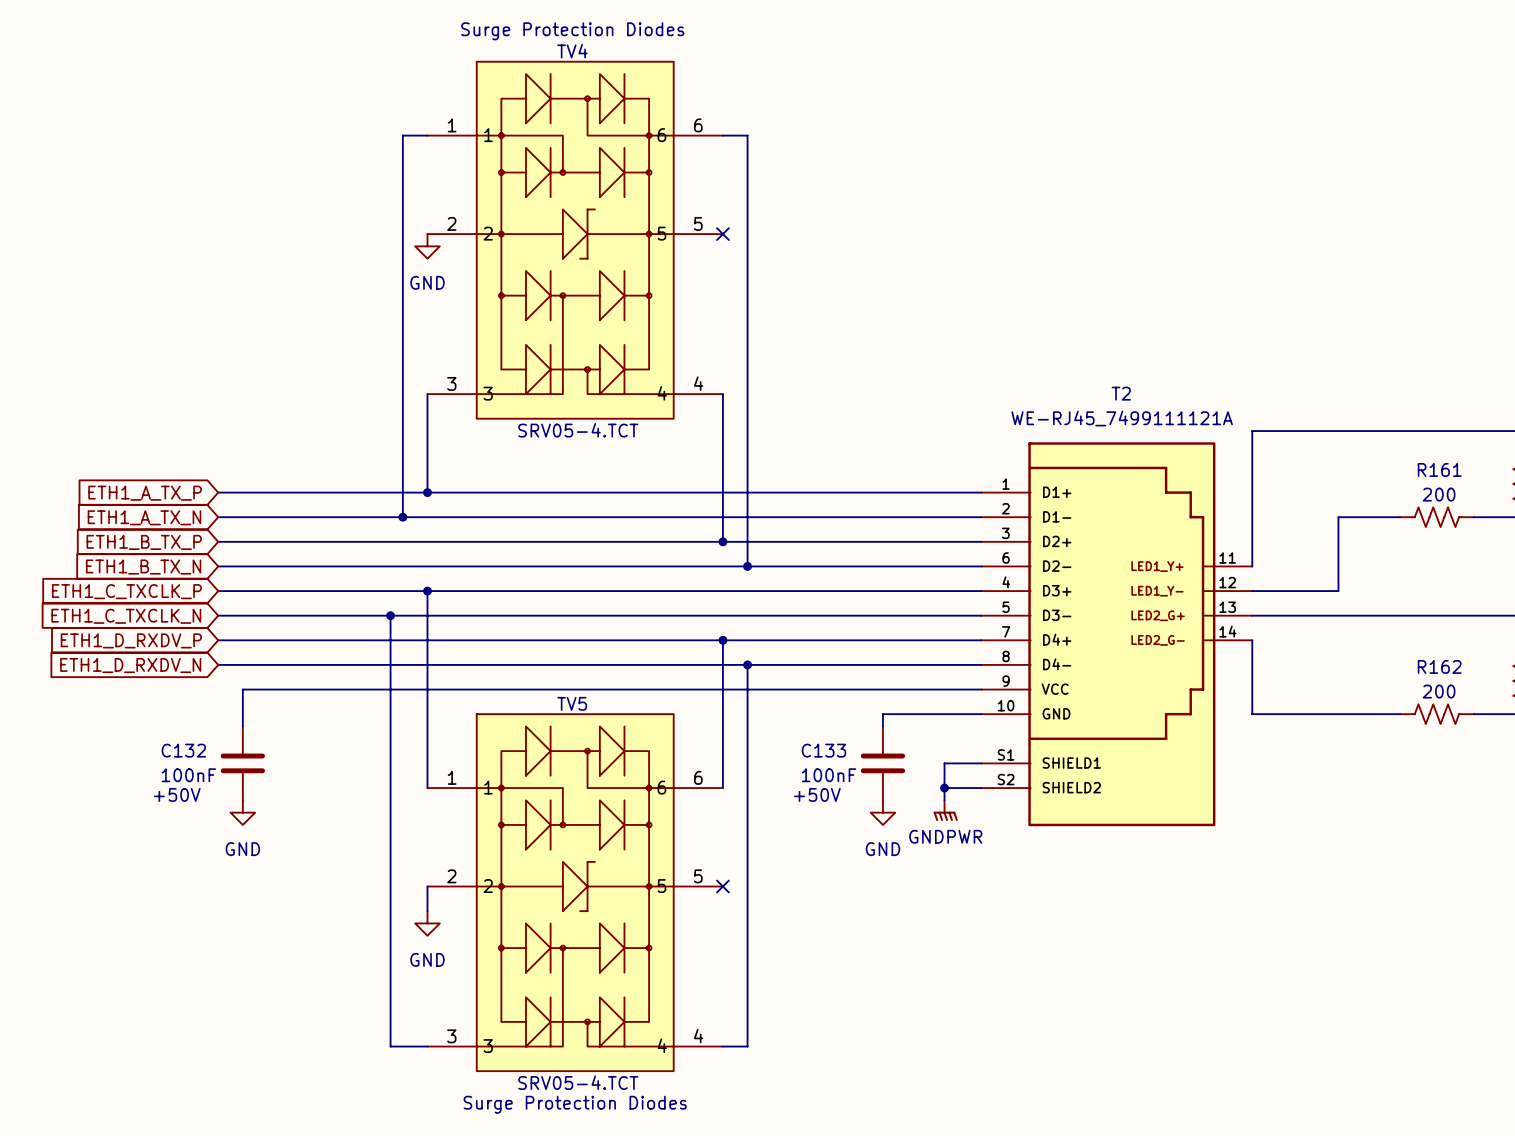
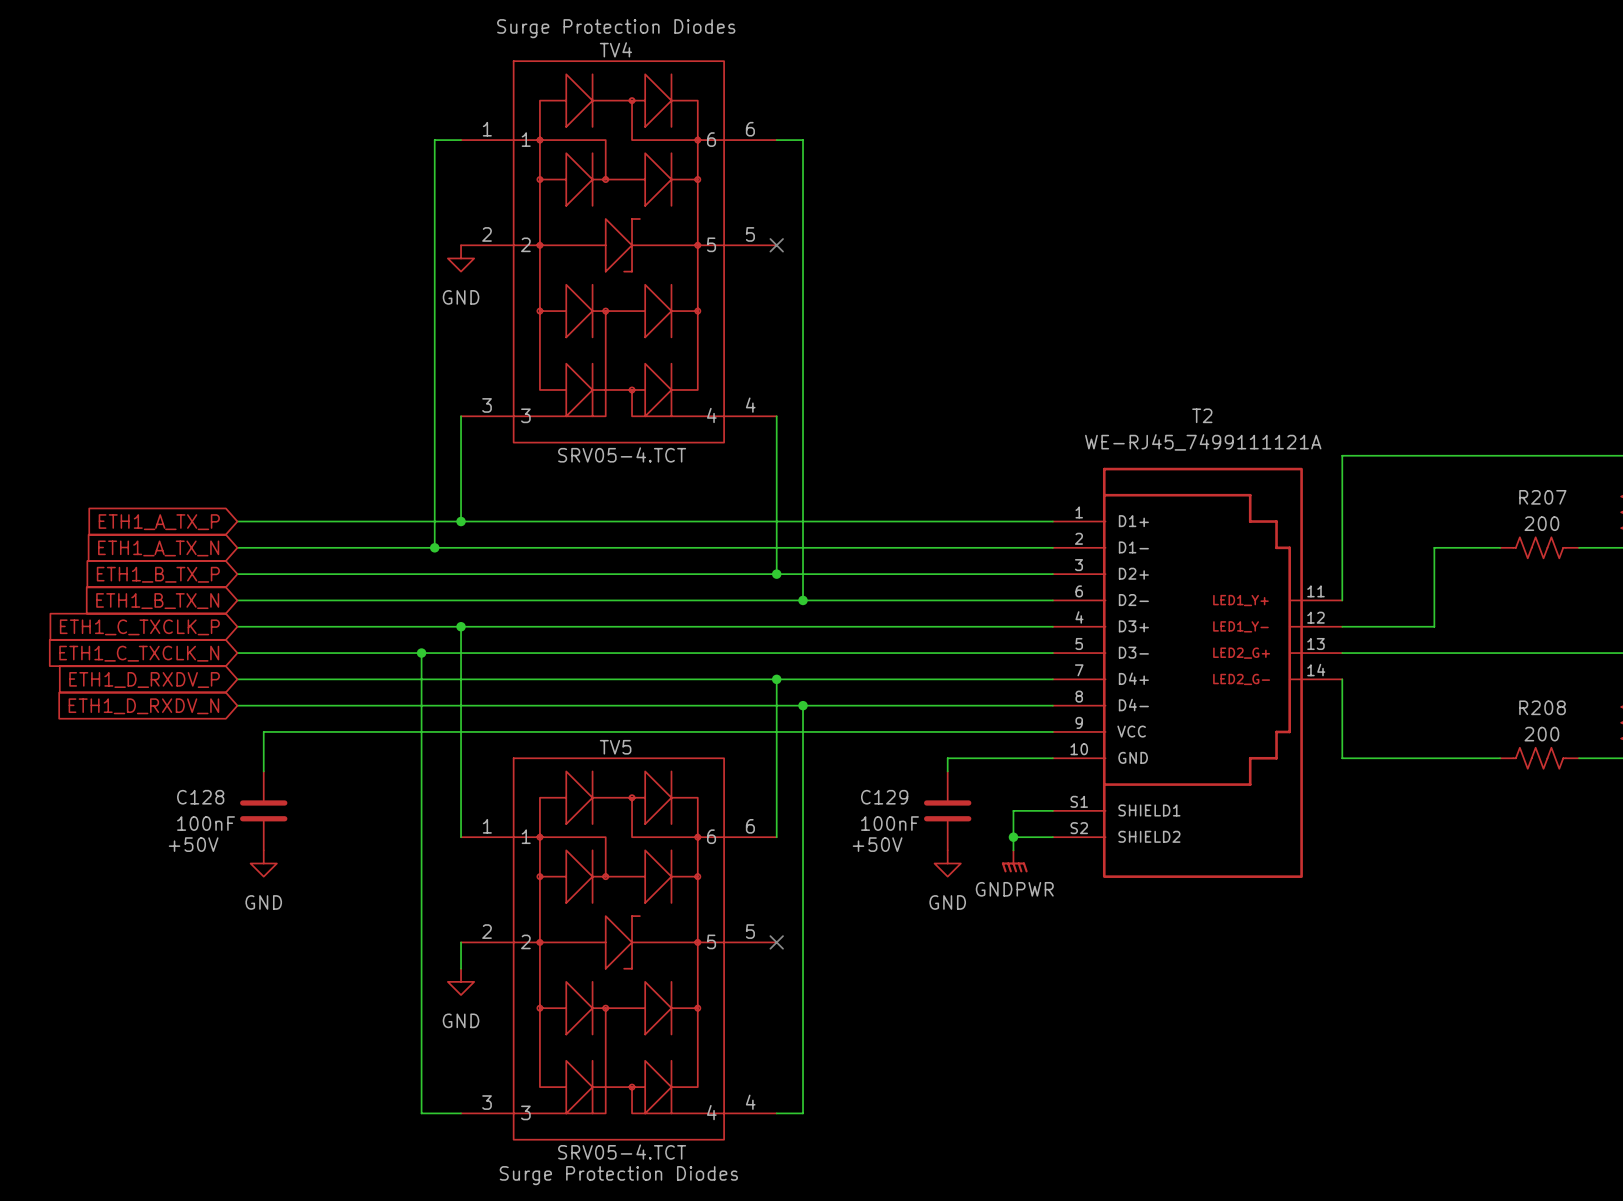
R161 name: R161 (1439, 469) -> R207 (1542, 497)
R162 name: R162 (1439, 666) -> R208 (1542, 707)
C132 name: C132 (183, 750) -> C128 (200, 797)
C133 name: C133 (823, 750) -> C129 (884, 797)

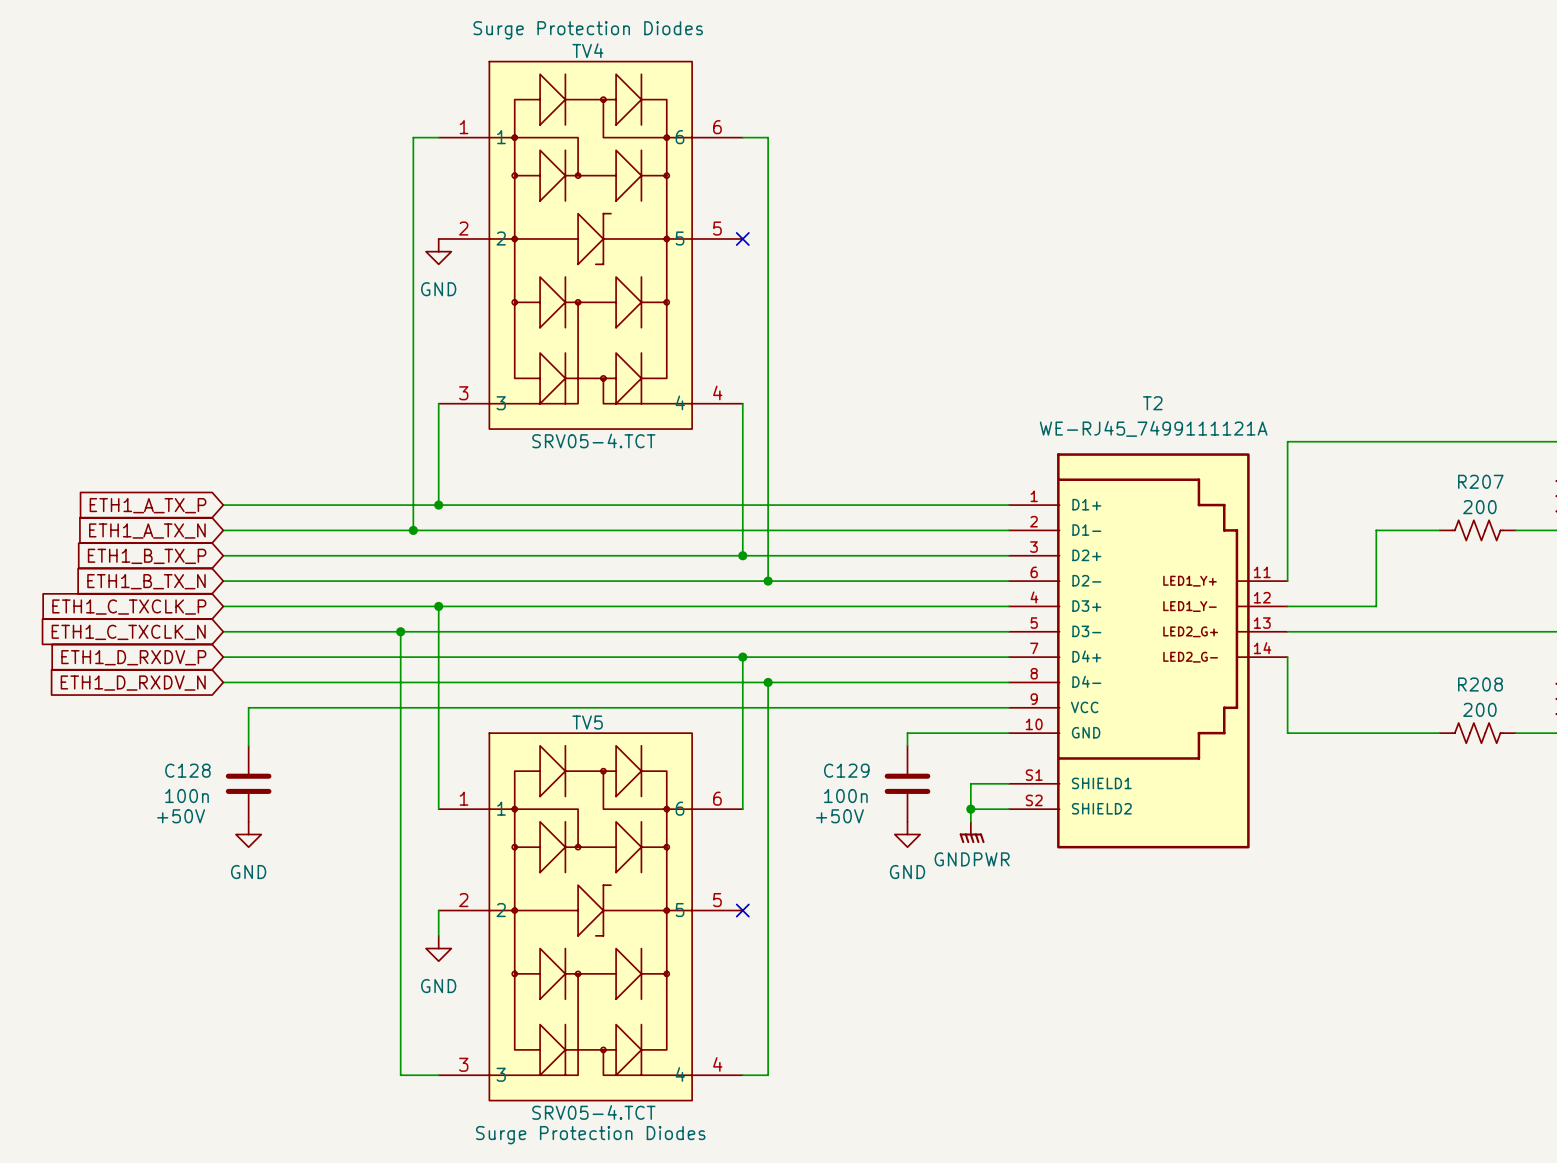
C128 value: 100nF (206, 823) -> 100n (187, 796)
C129 value: 100nF (889, 823) -> 100n (845, 796)

